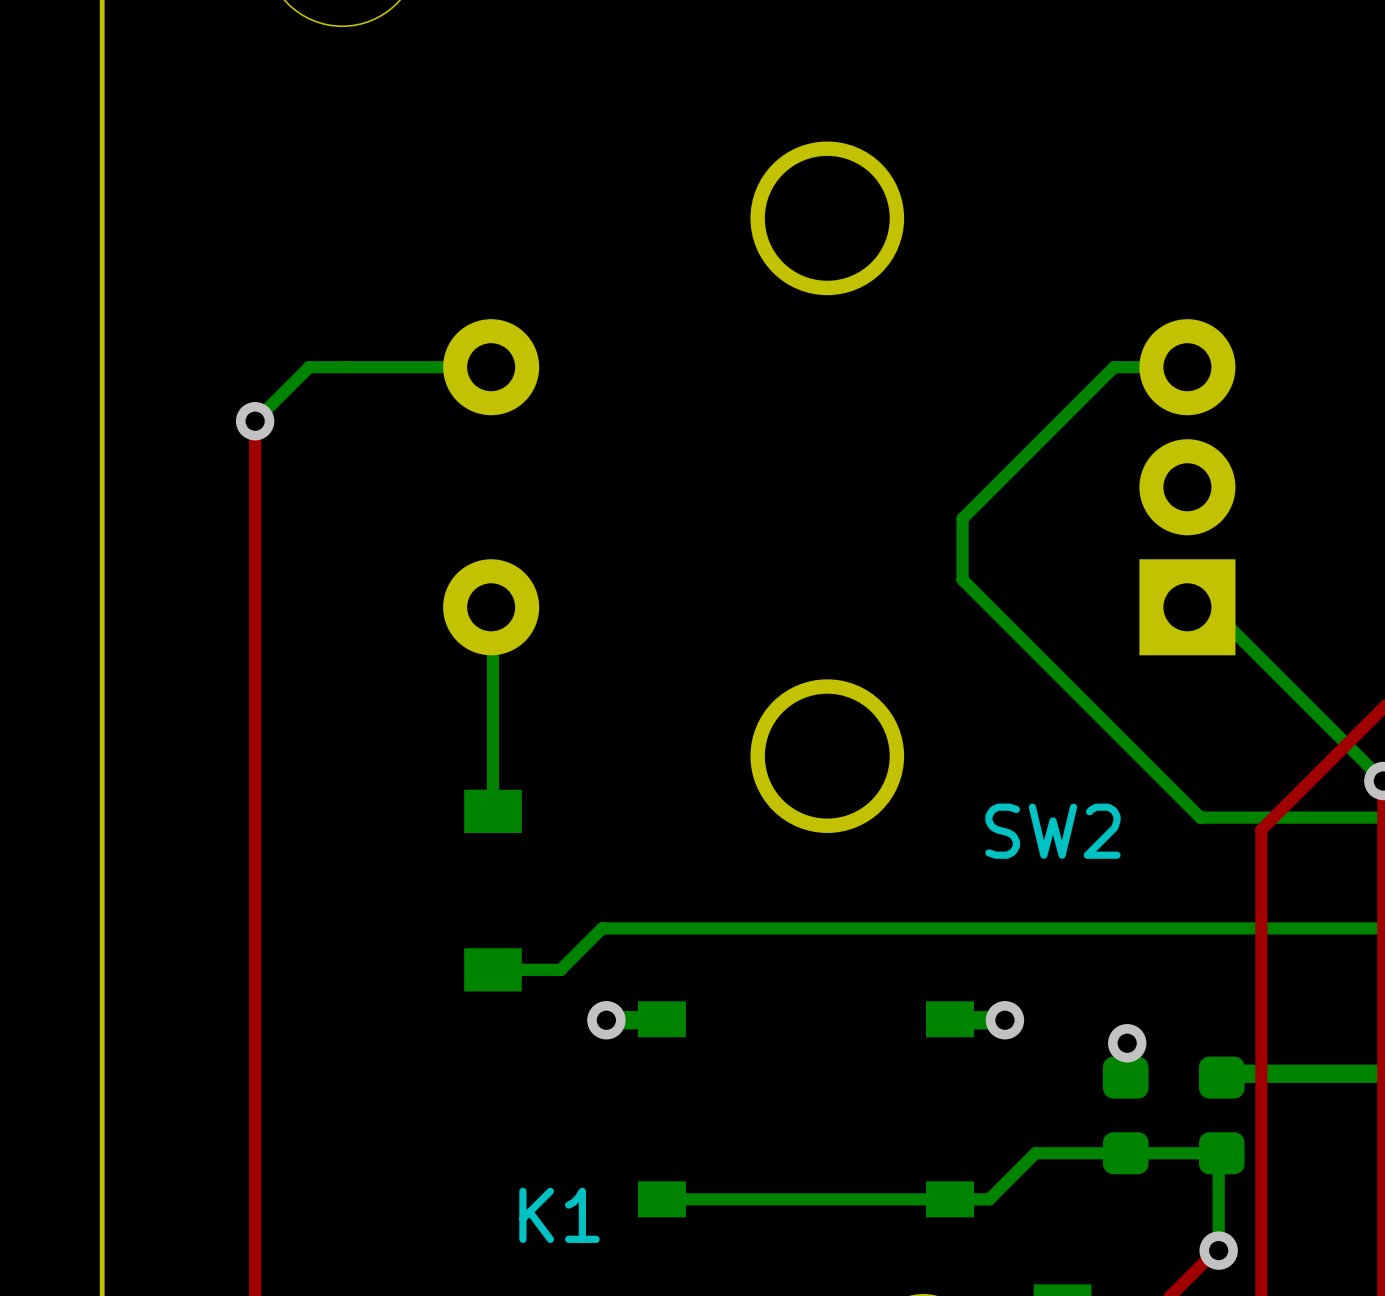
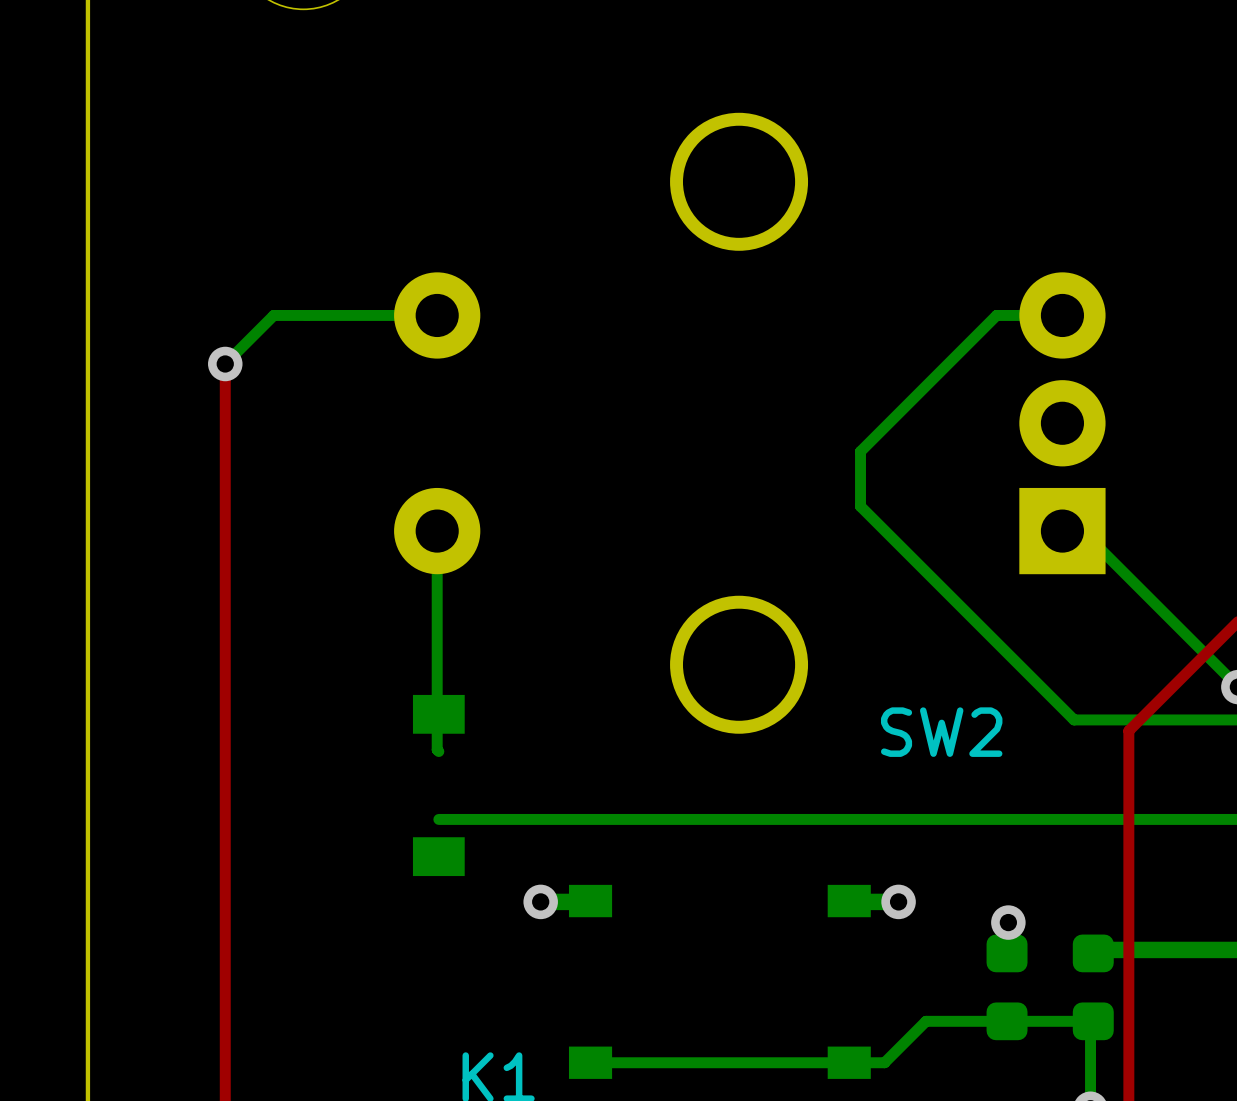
bottom track: (491, 607) (492, 609) (492, 811) -> (437, 531) (437, 749) (438, 751)
bottom track: (602, 928) (560, 969) (492, 969) -> (536, 819) (438, 819)

